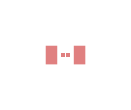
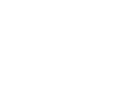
part: (65, 55) -> none
part: (65, 55) -> none

